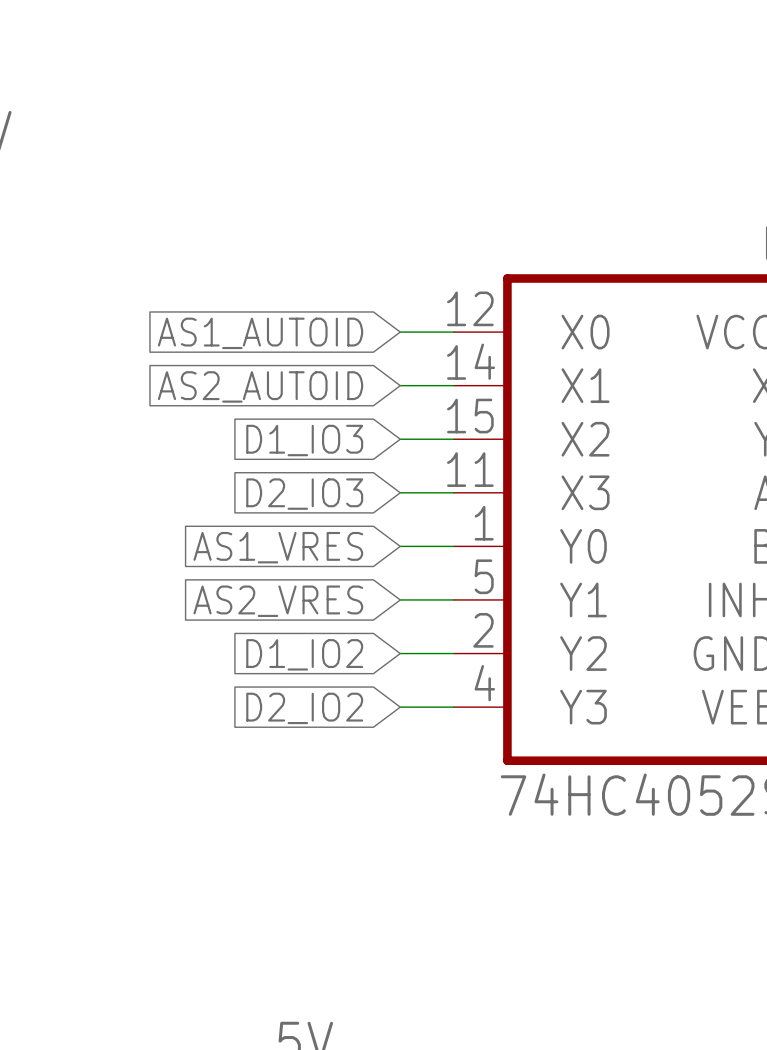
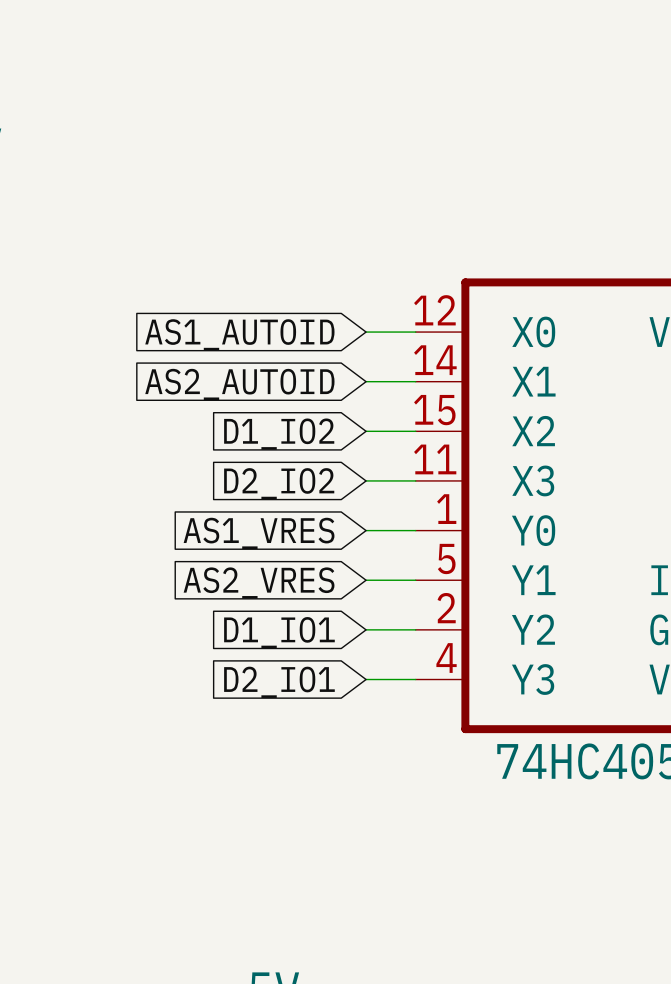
global label: D1_IO3 (304, 440) -> D1_IO2 (279, 434)
global label: D2_IO3 (304, 494) -> D2_IO2 (279, 483)
global label: D1_IO2 (304, 654) -> D1_IO1 (279, 632)
global label: D2_IO2 (304, 708) -> D2_IO1 (279, 682)

